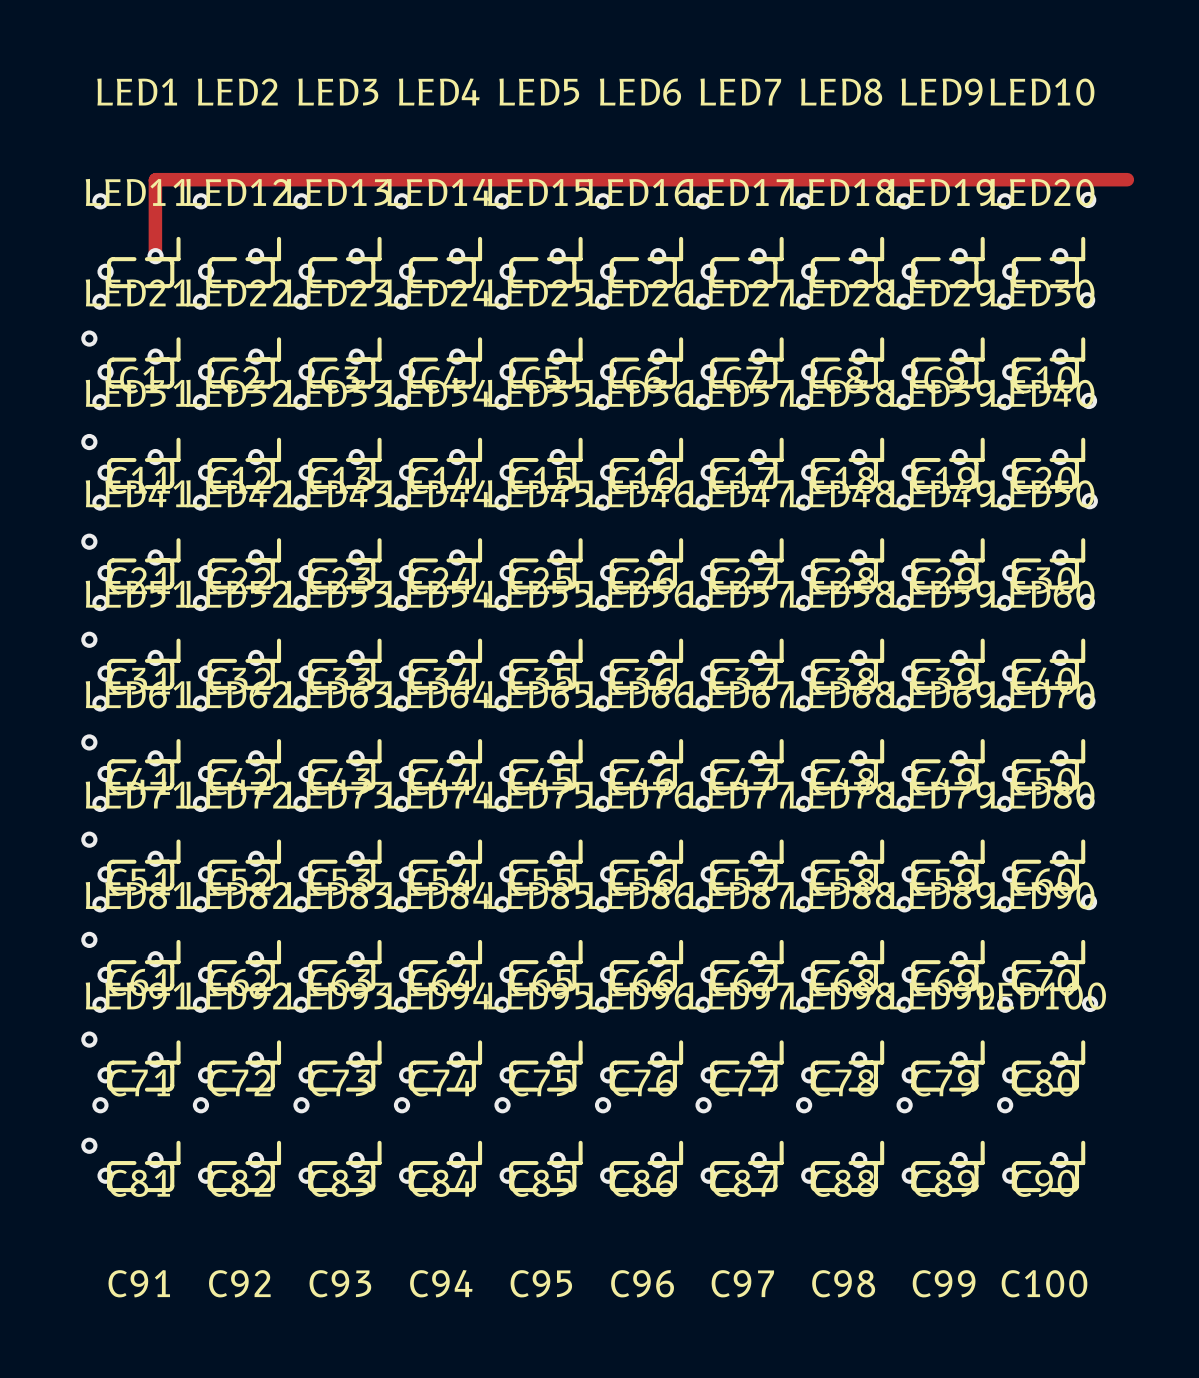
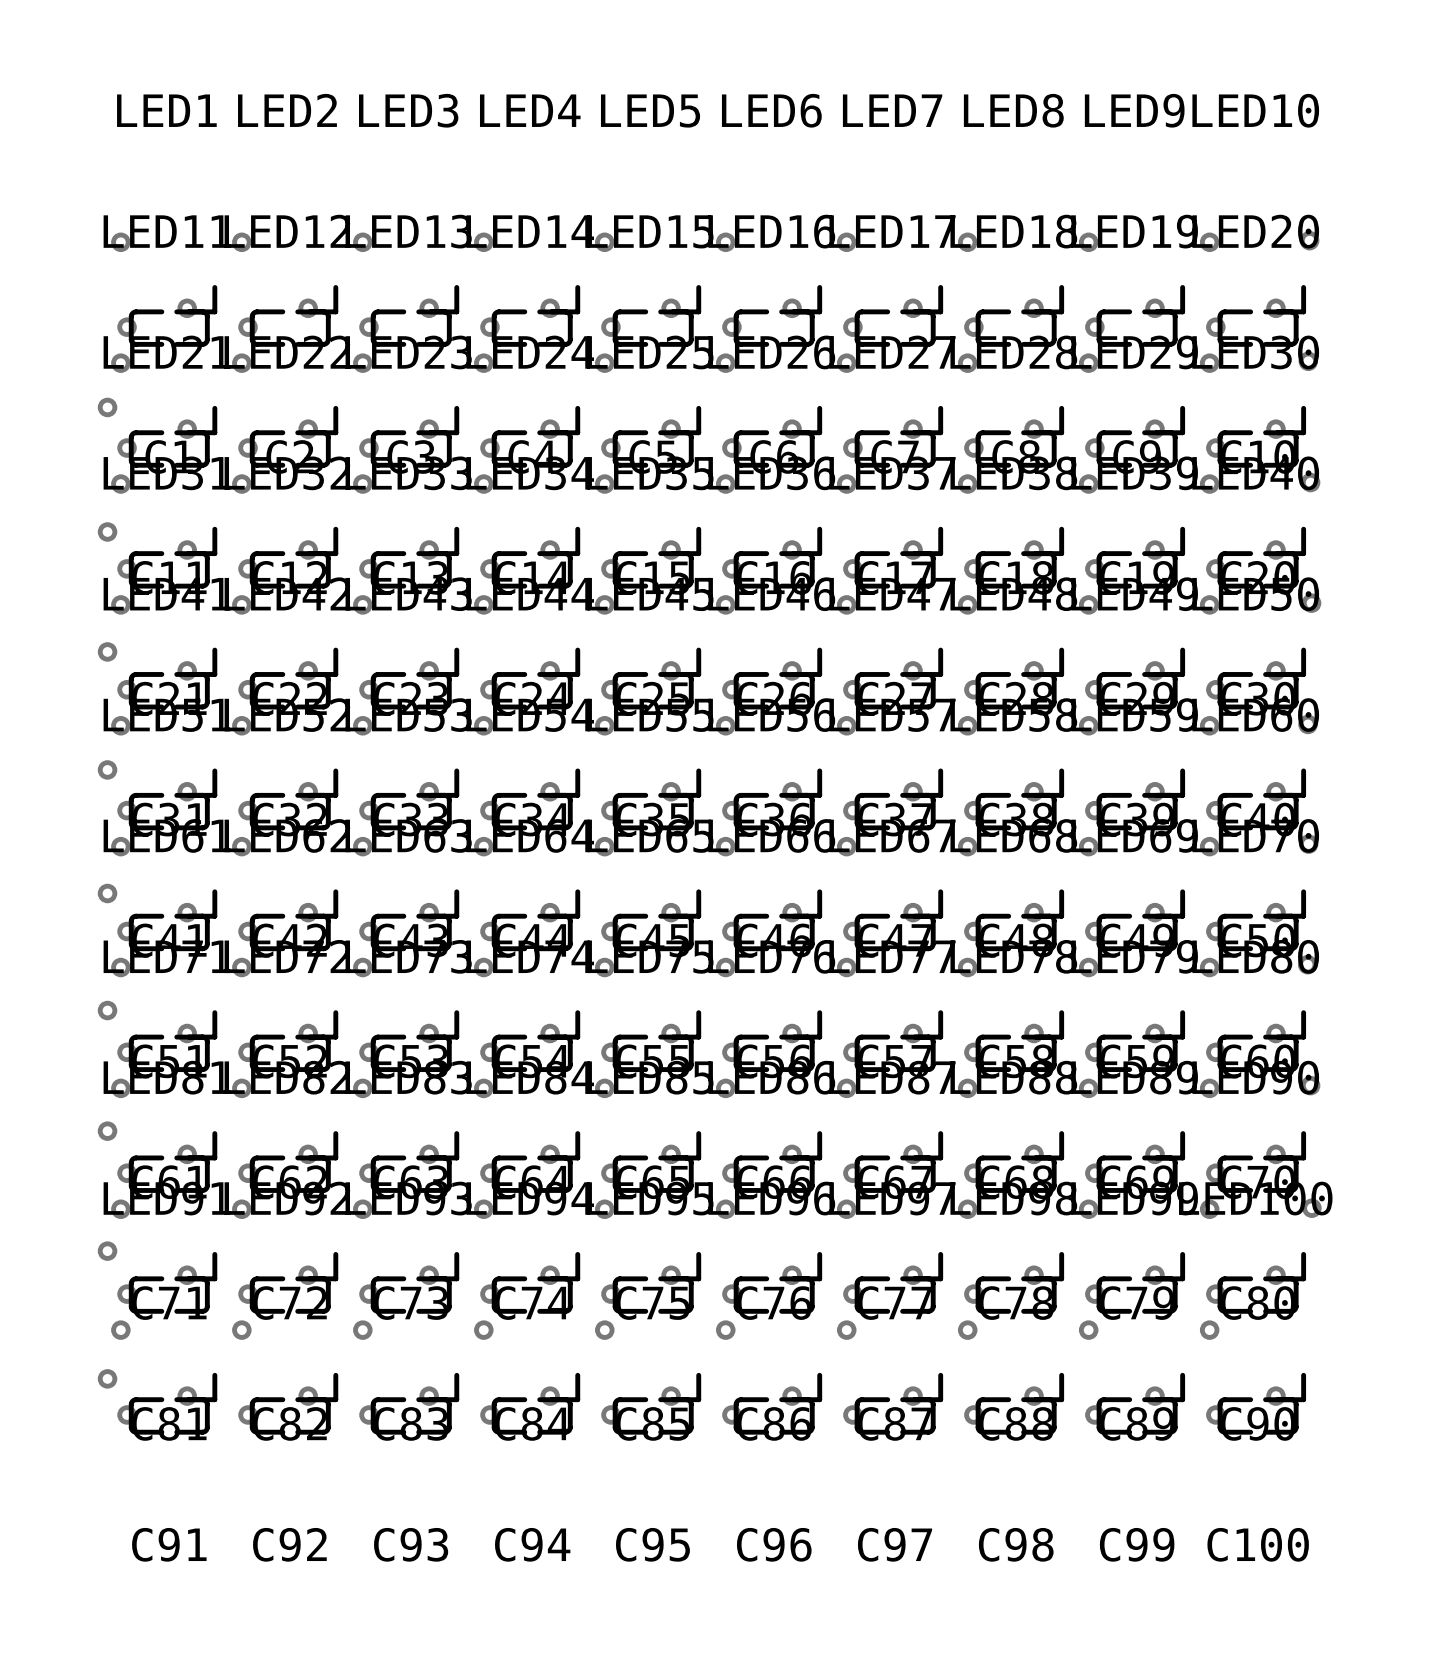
track: (1127, 179) (155, 179) (155, 256) -> none

